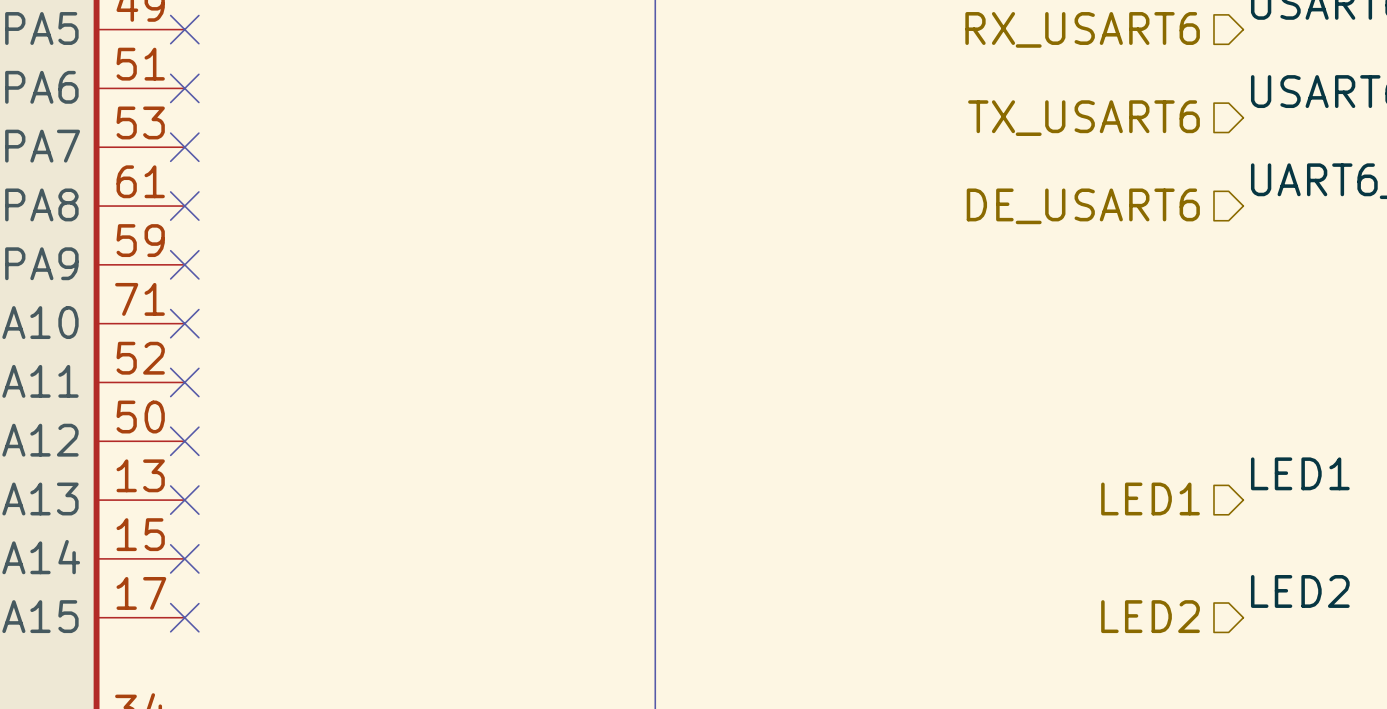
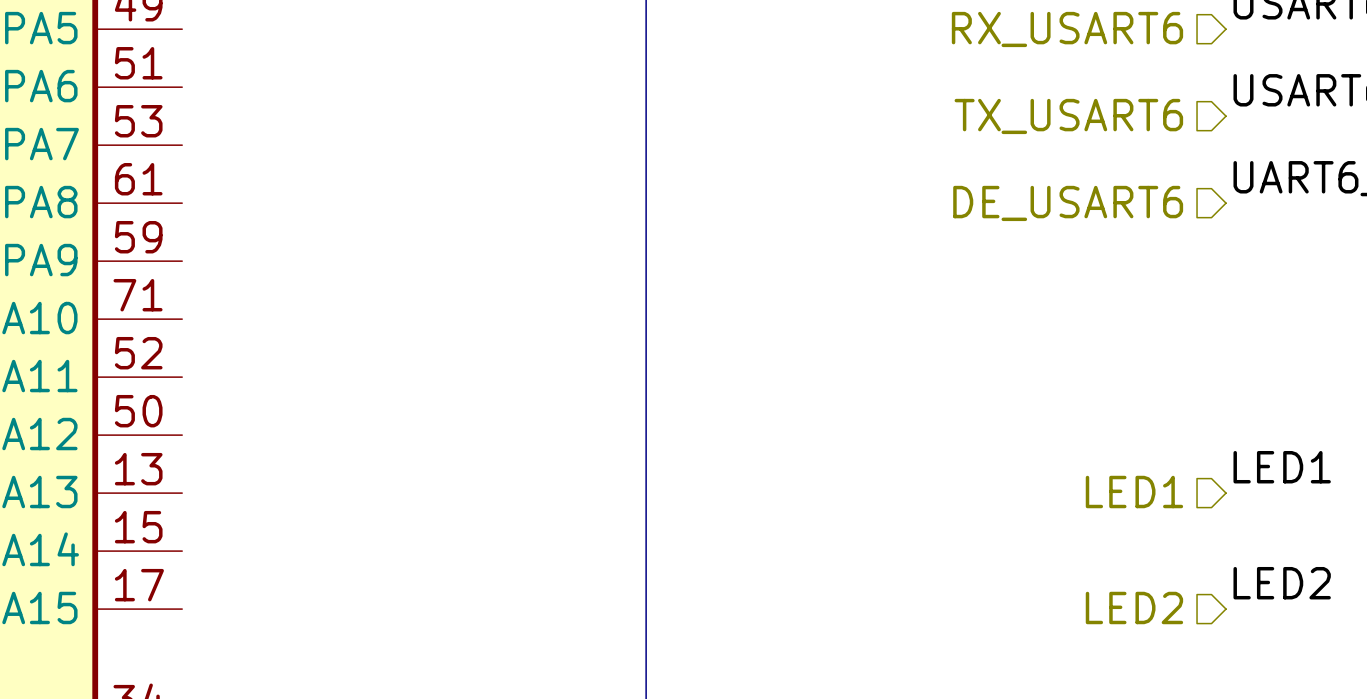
no-connect mark: (184, 29) -> none
no-connect mark: (184, 88) -> none
no-connect mark: (184, 147) -> none
no-connect mark: (184, 206) -> none
no-connect mark: (184, 264) -> none
no-connect mark: (184, 323) -> none
no-connect mark: (184, 382) -> none
no-connect mark: (184, 441) -> none
no-connect mark: (184, 500) -> none
no-connect mark: (184, 558) -> none
no-connect mark: (184, 617) -> none

